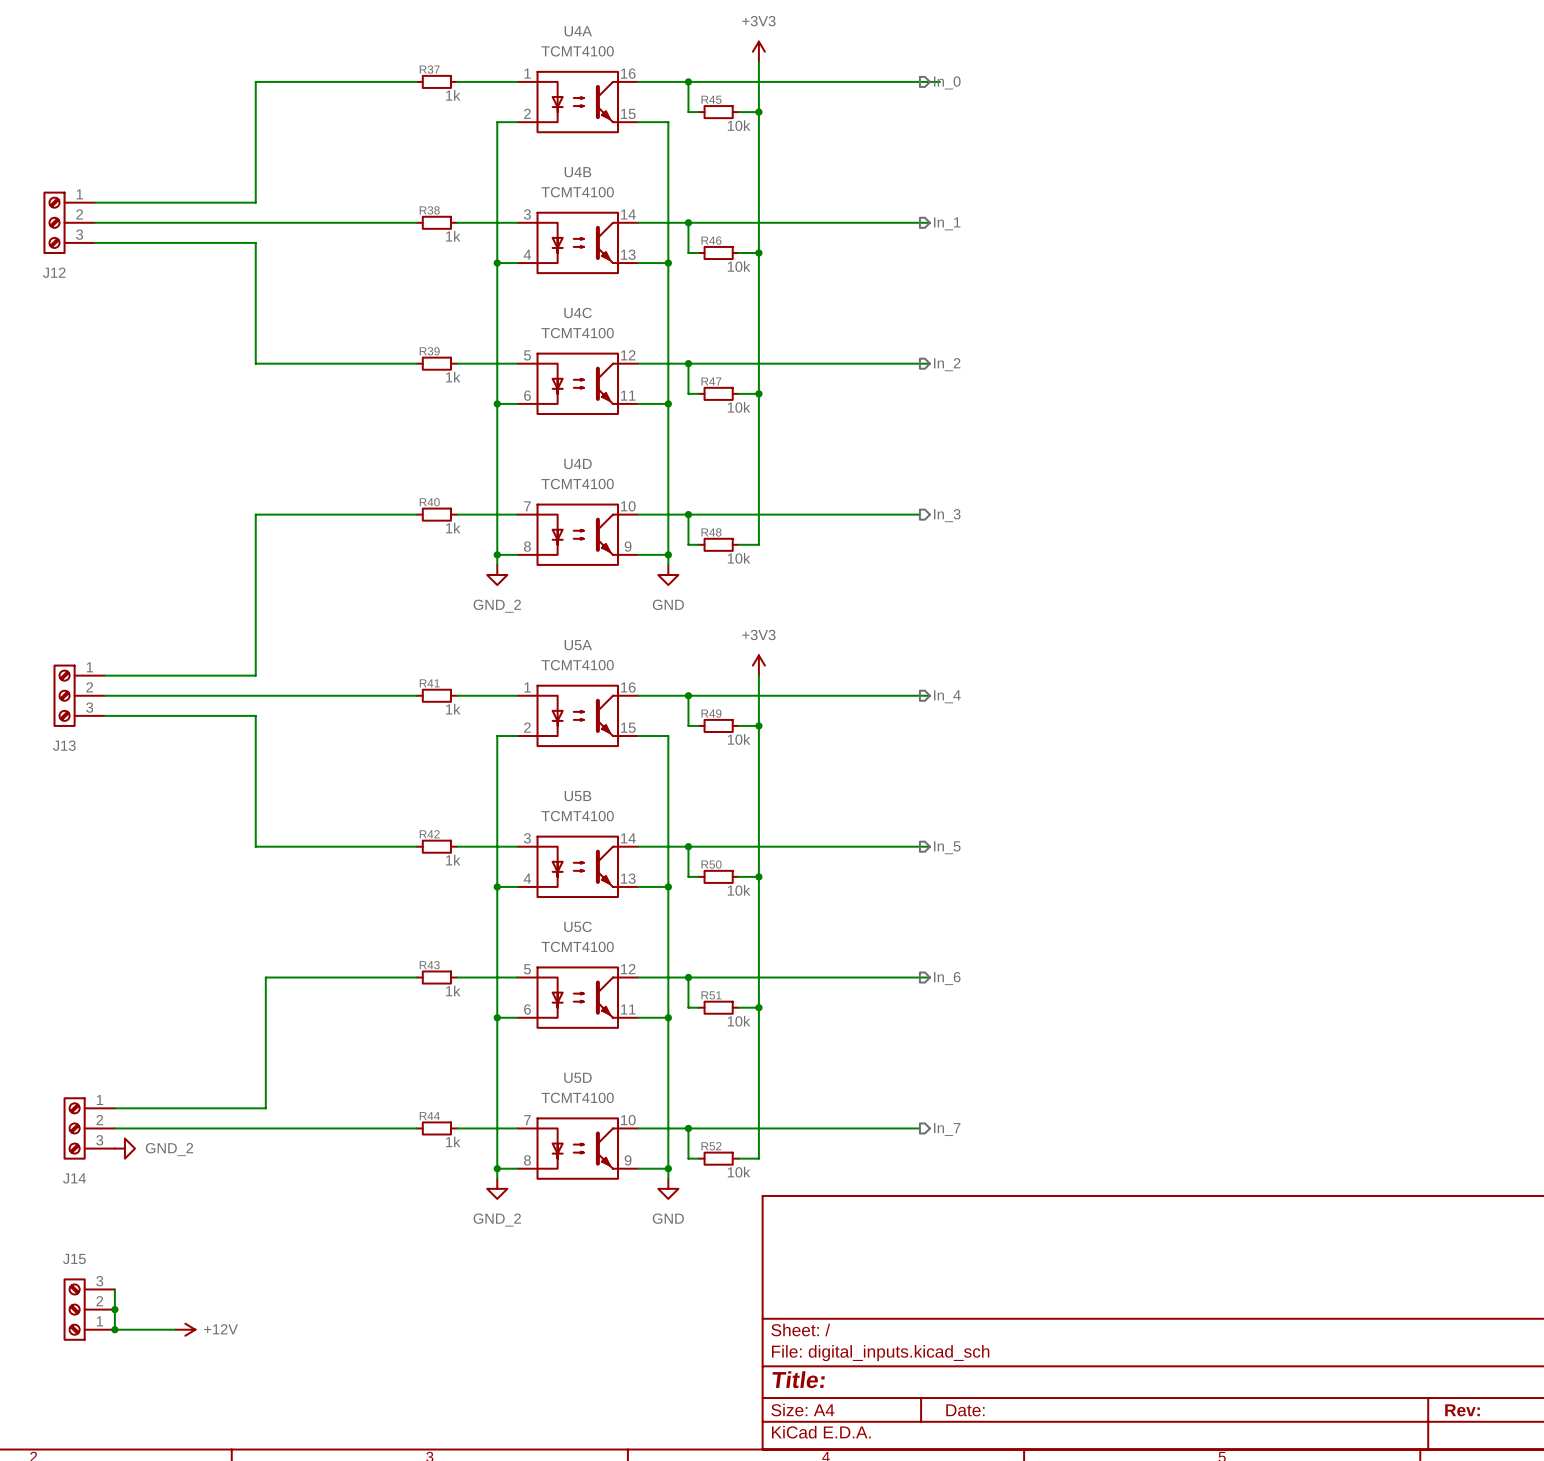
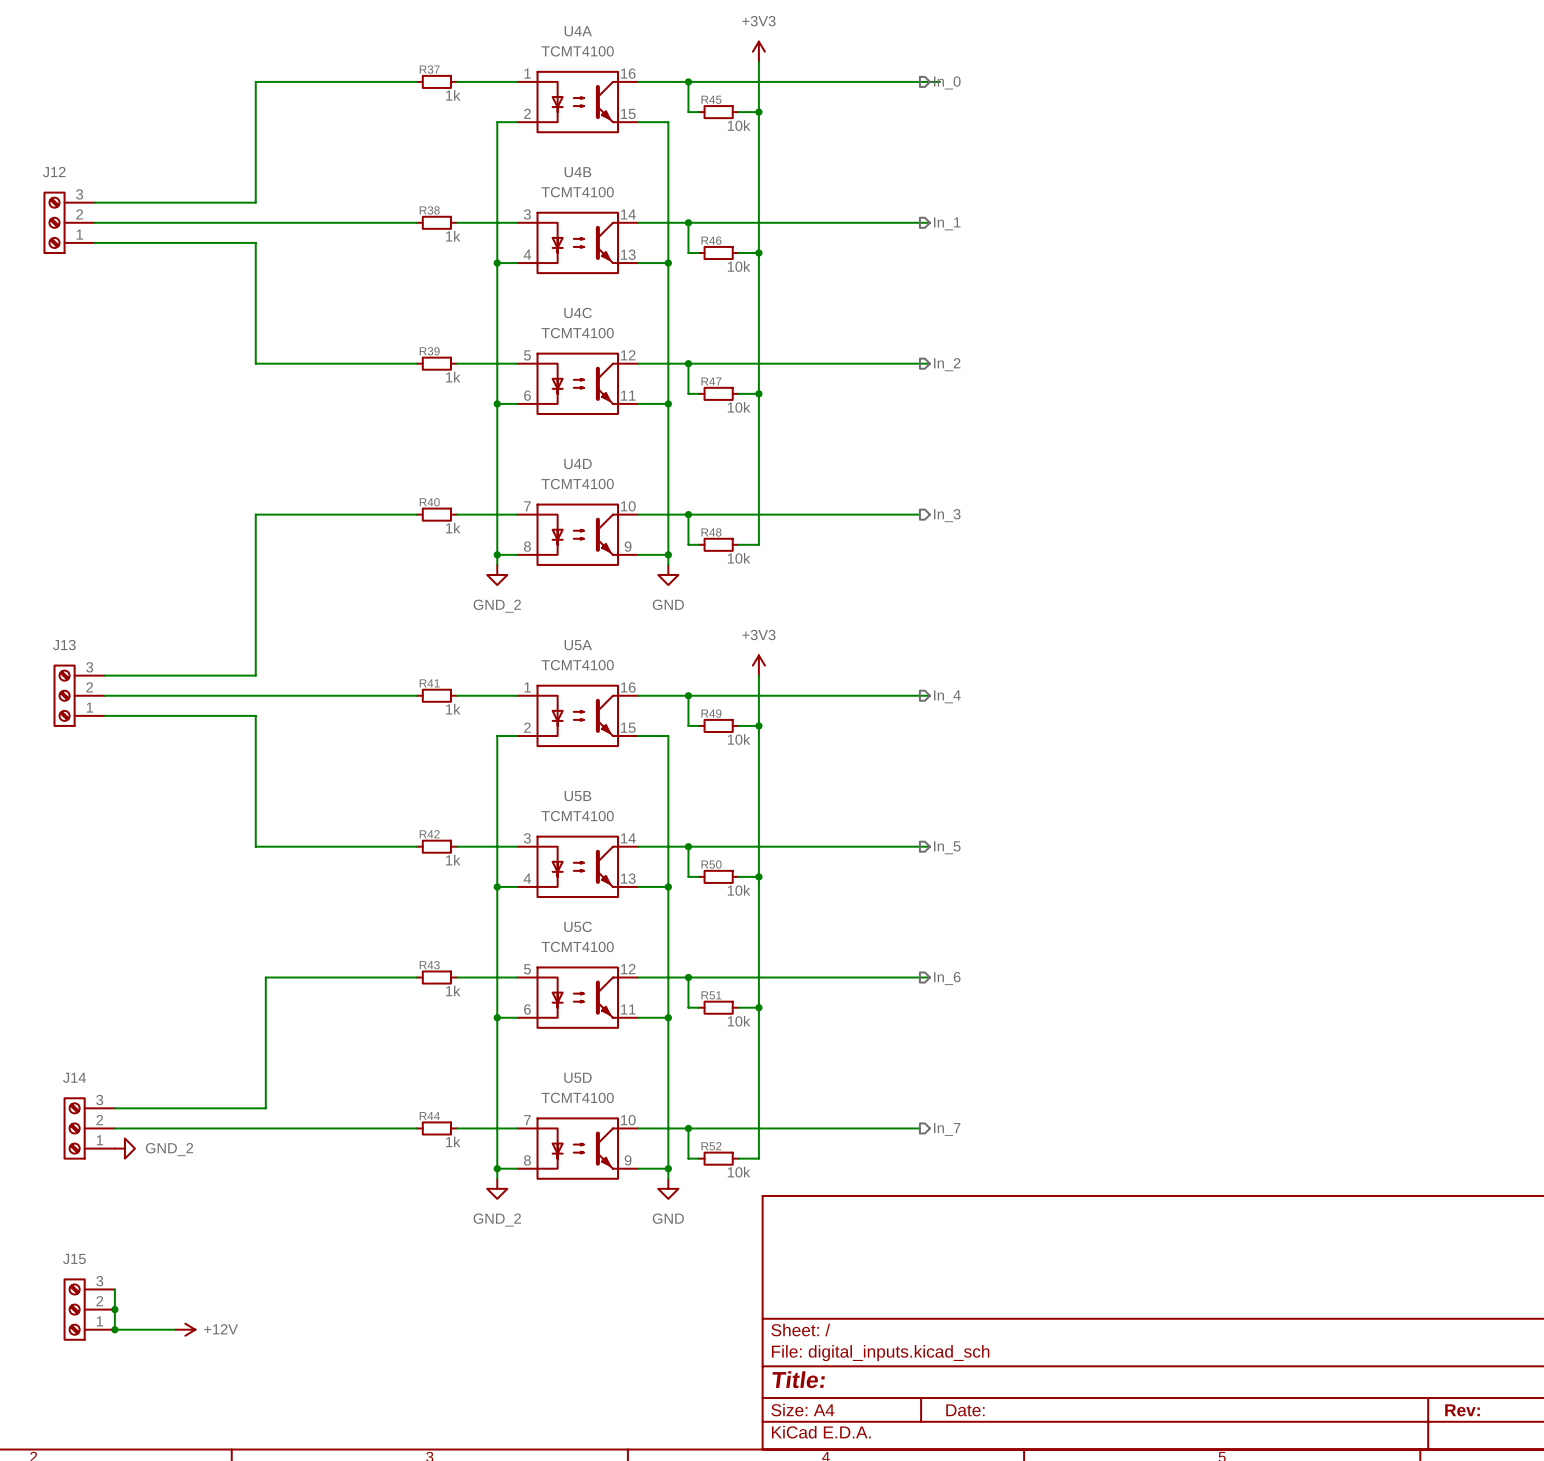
J12 flip: as is (54, 222) -> up-down (54, 222)
J13 flip: as is (64, 695) -> up-down (64, 695)
J14 flip: as is (74, 1128) -> up-down (74, 1128)

